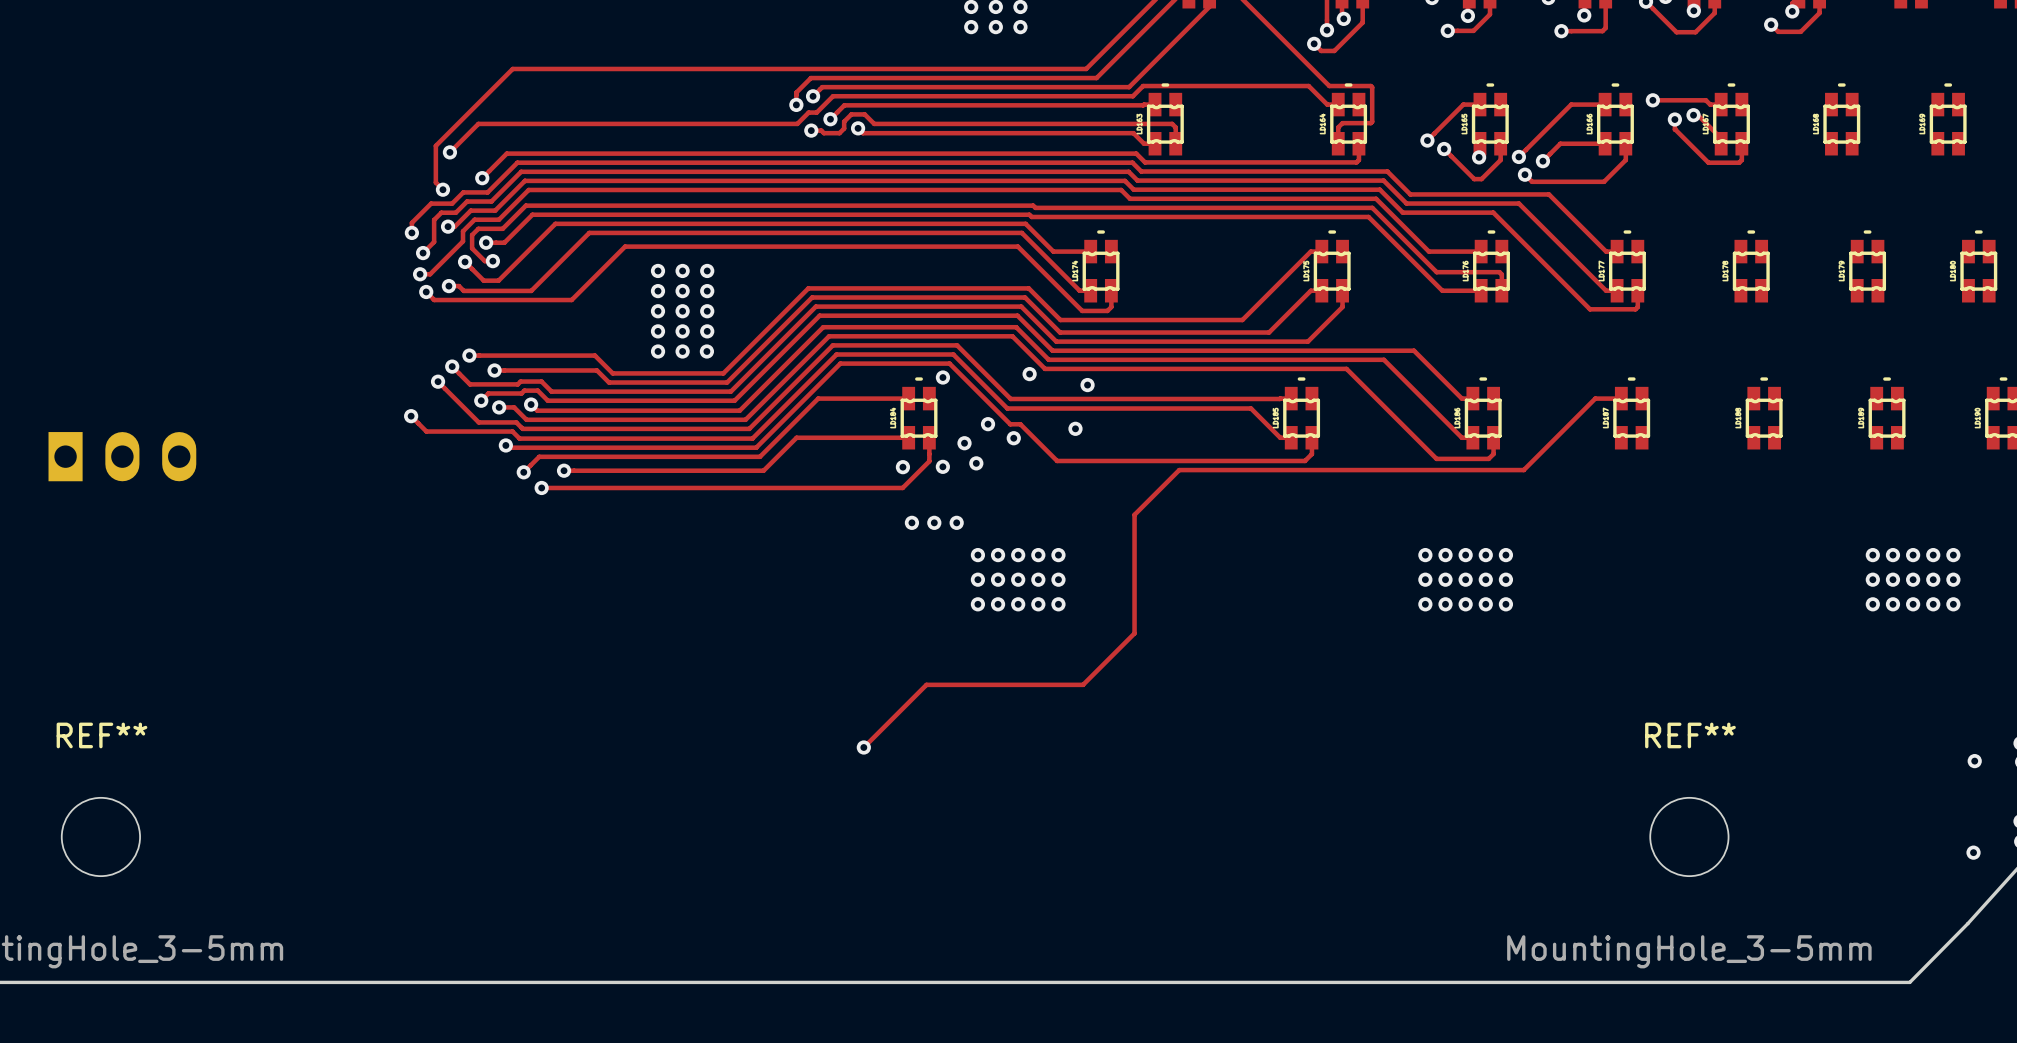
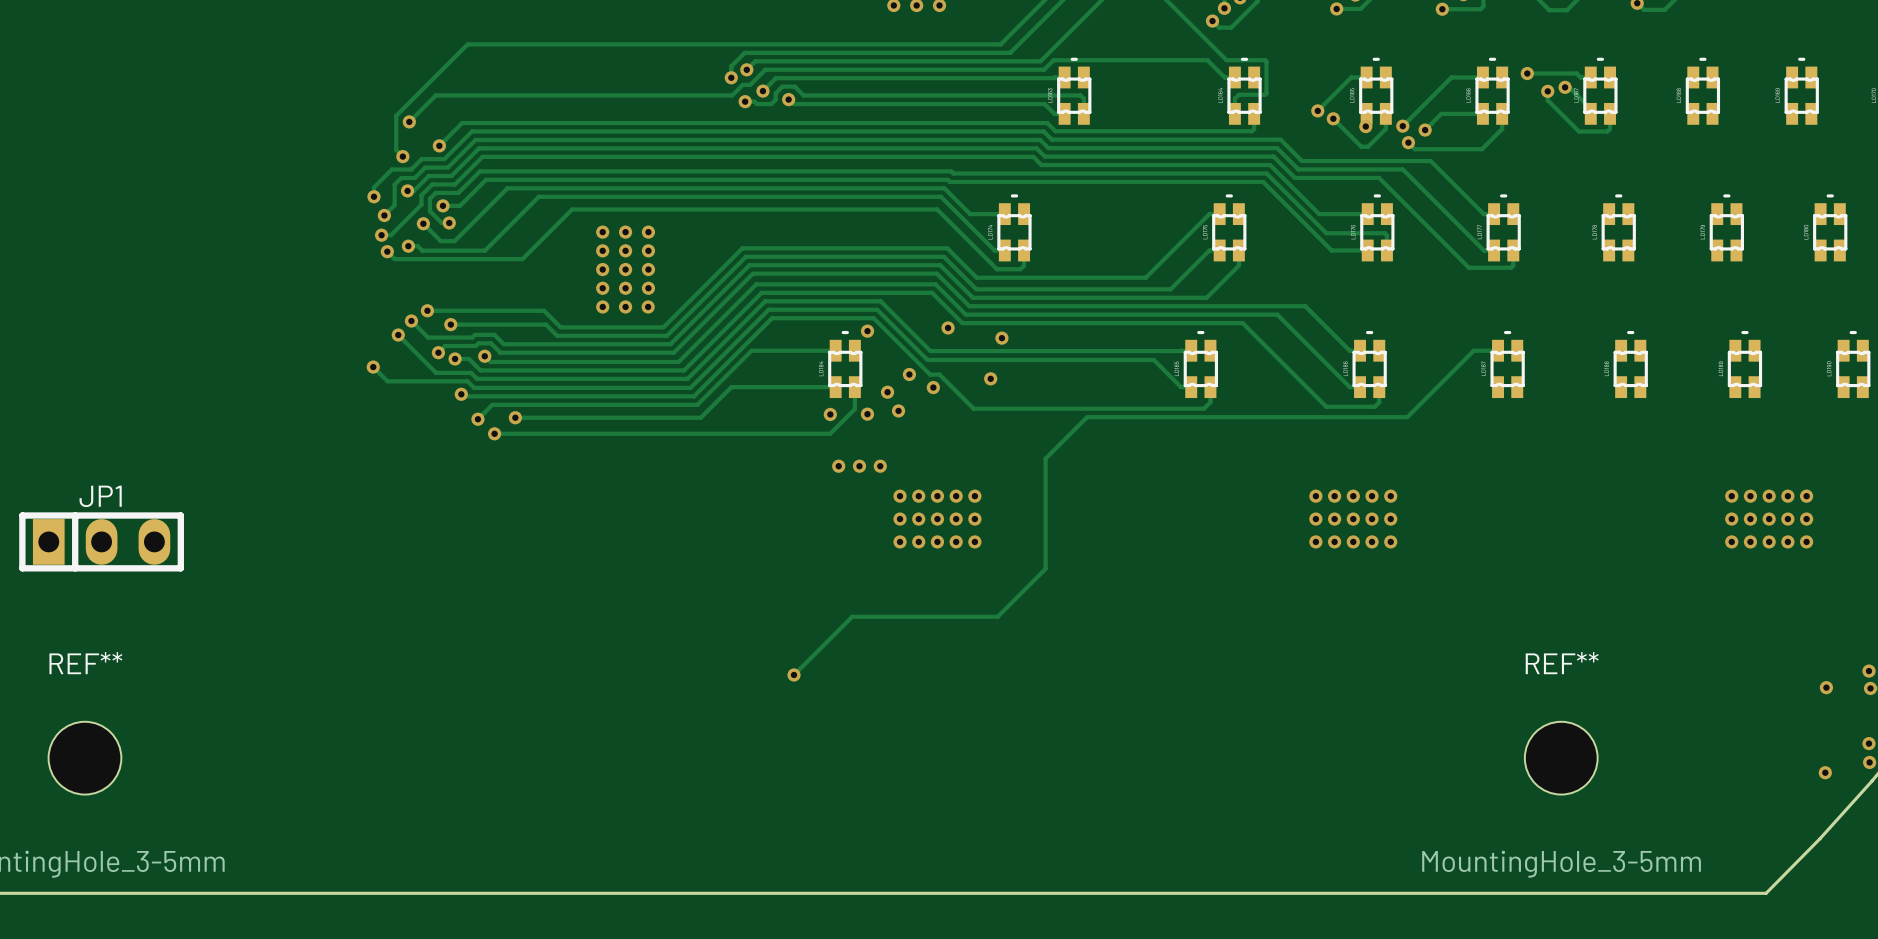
JP1 side: bottom (122, 456) -> top (101, 541)

